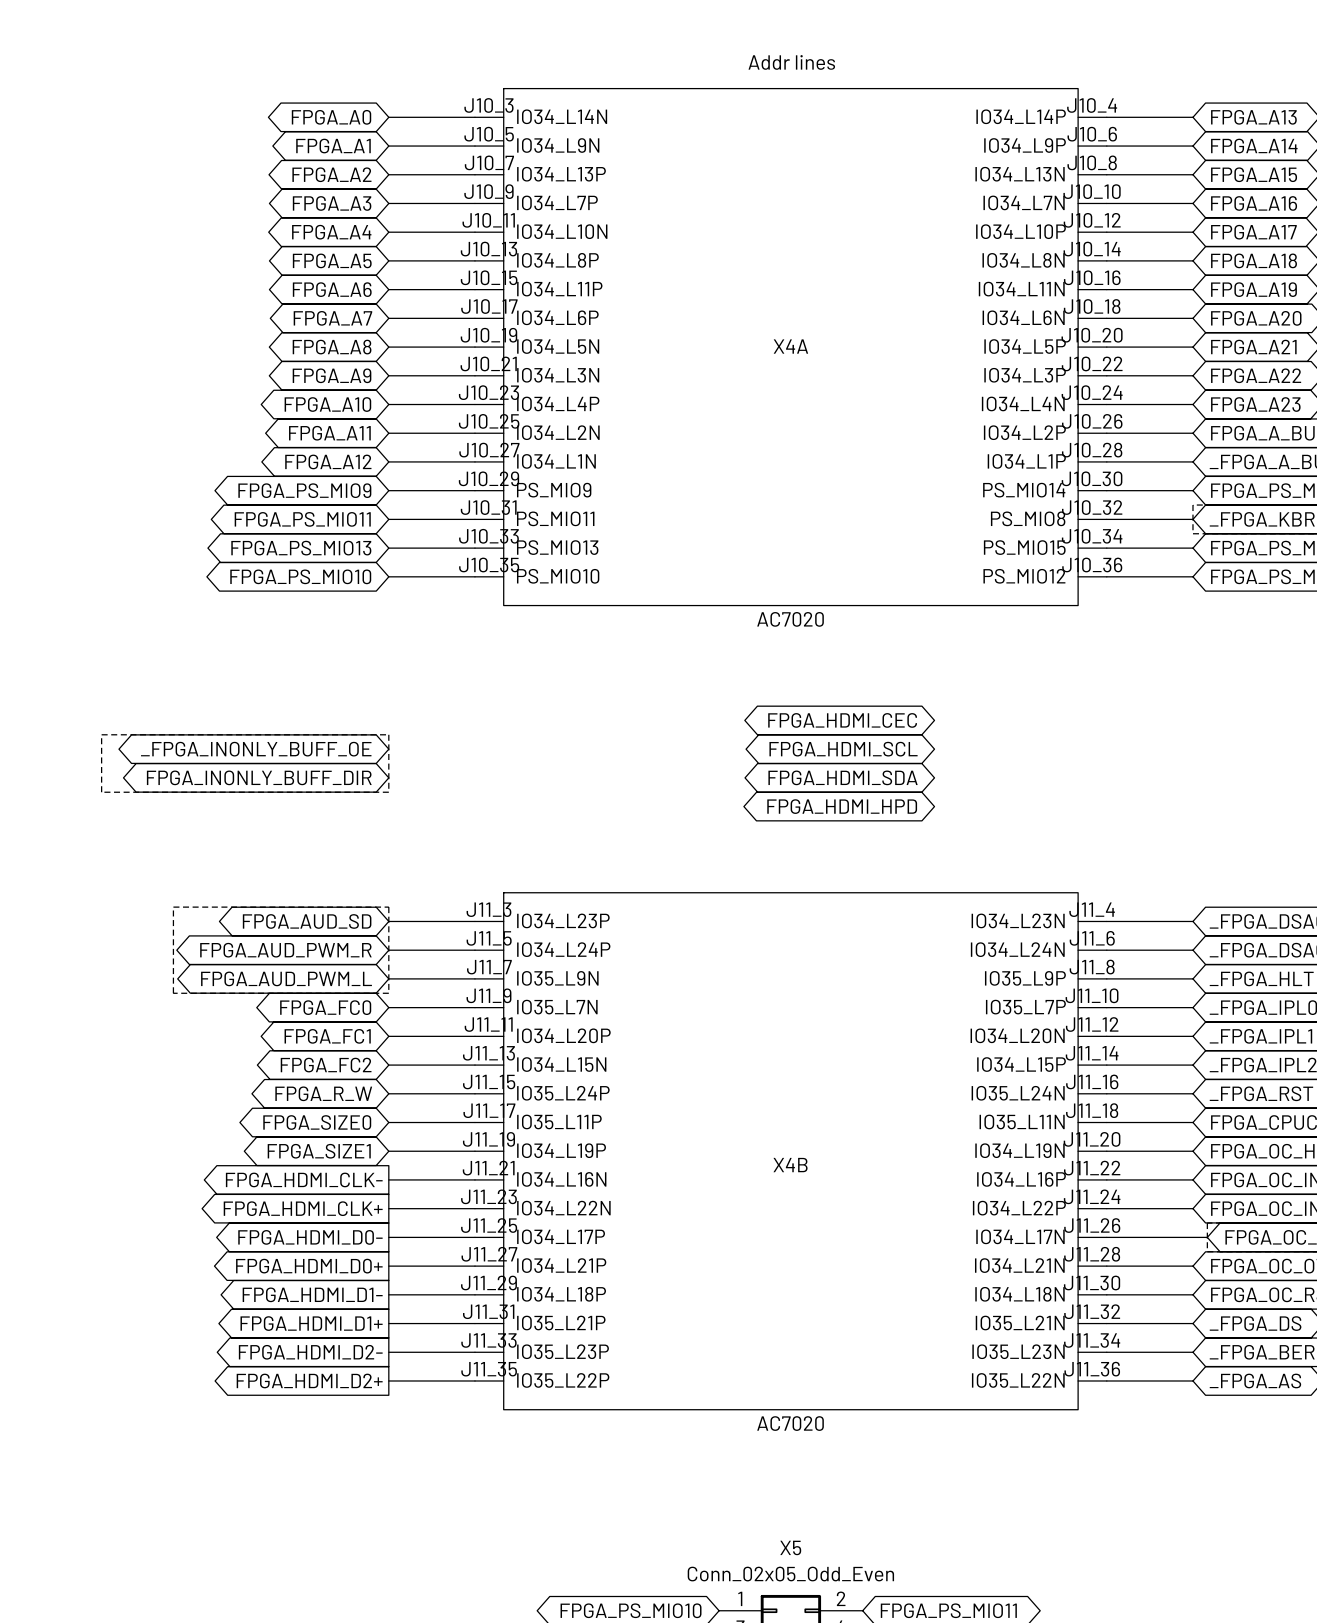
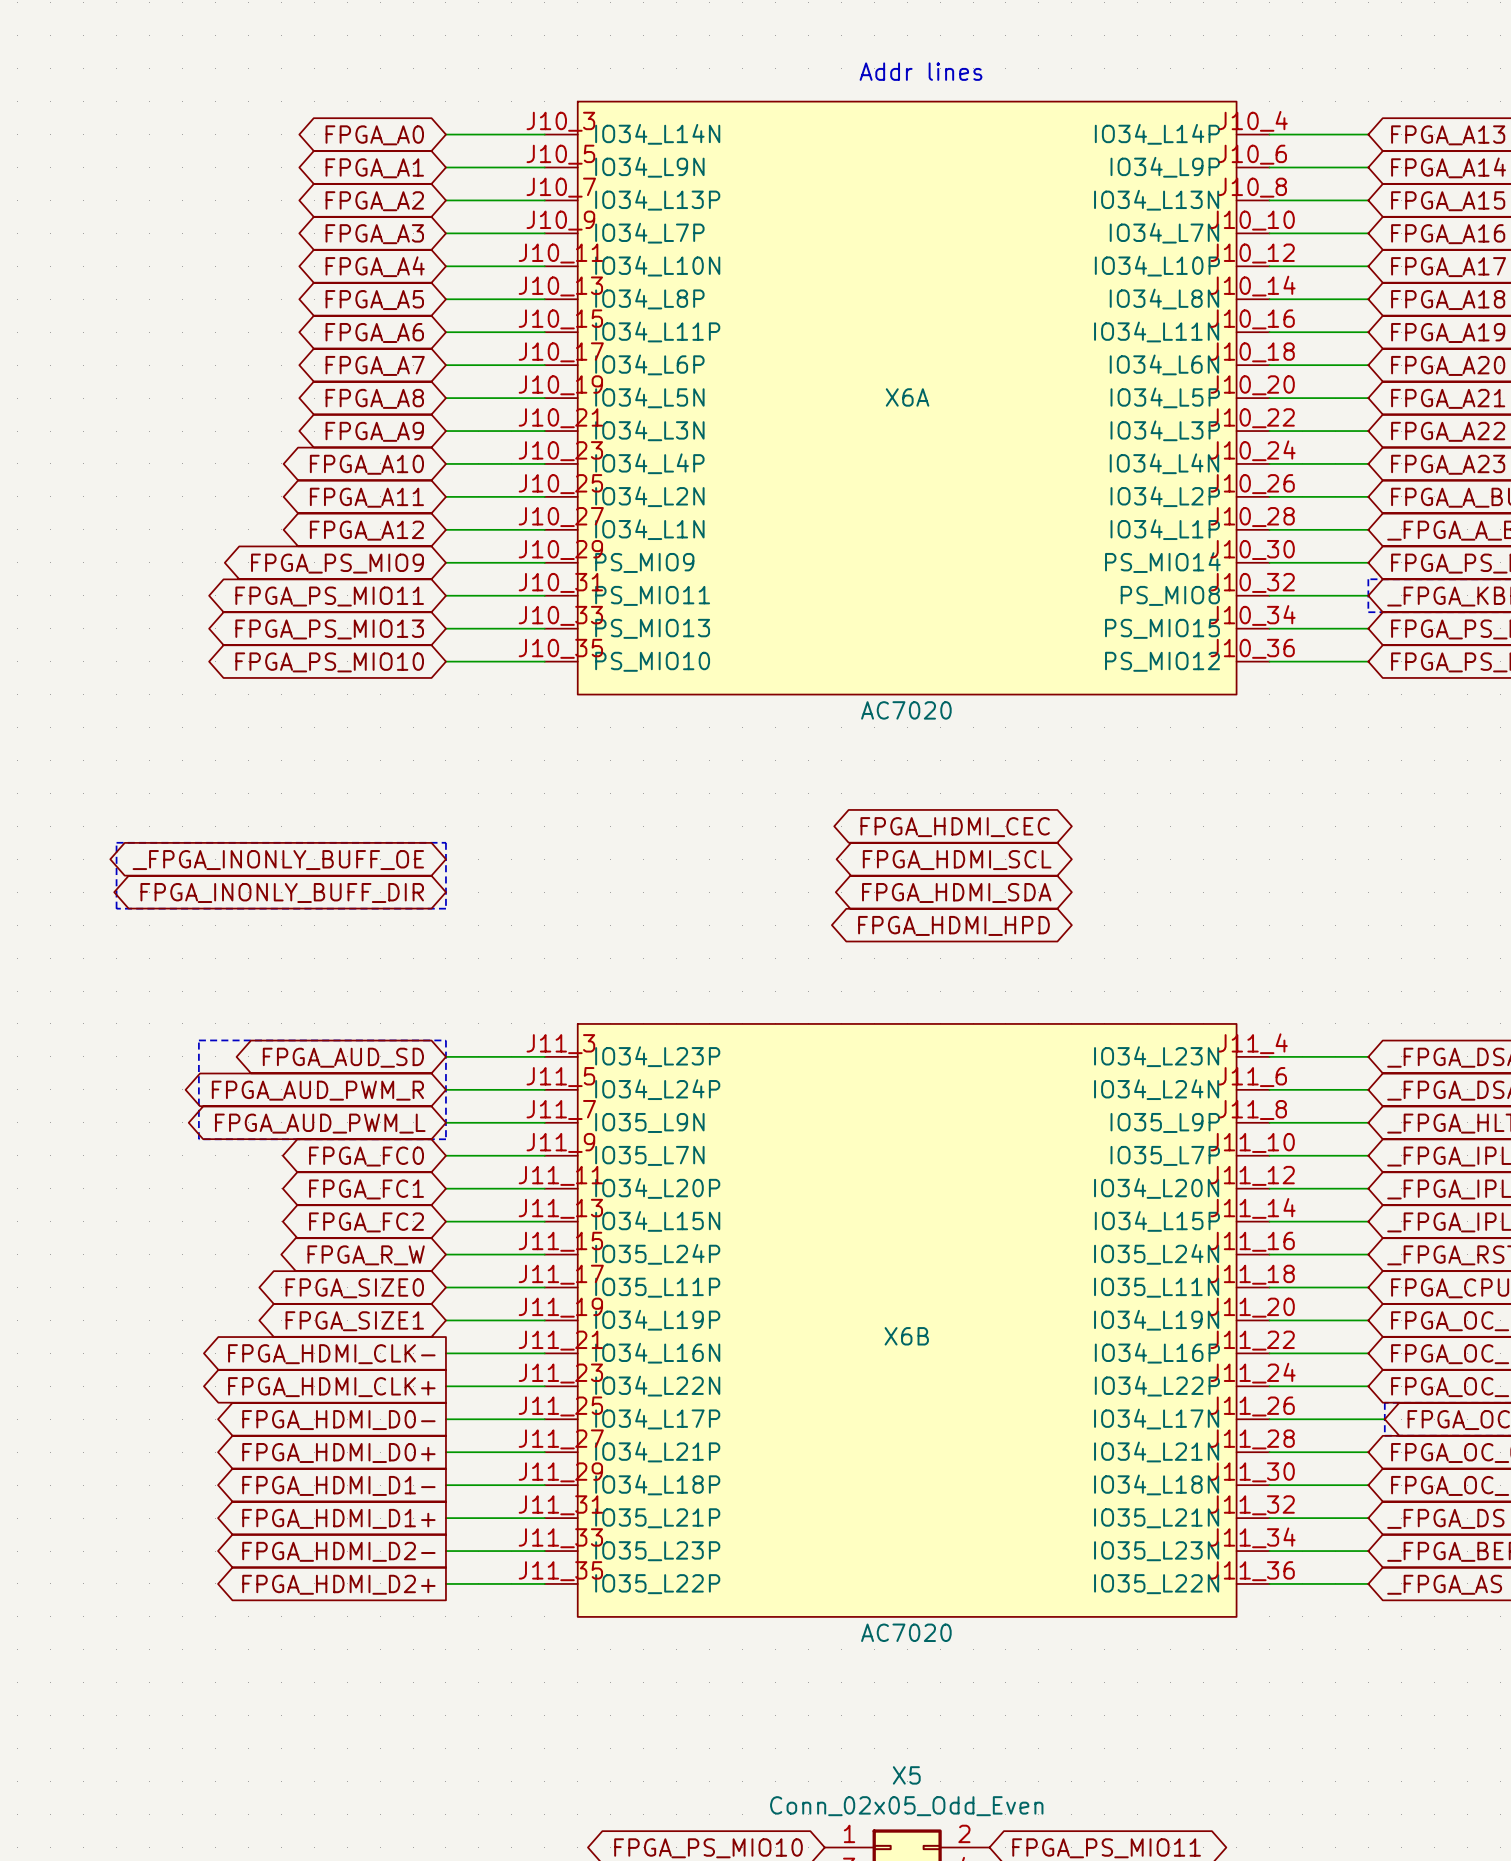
X4A name: X4A (790, 346) -> X6A (907, 397)
X4B name: X4B (790, 1165) -> X6B (906, 1336)

